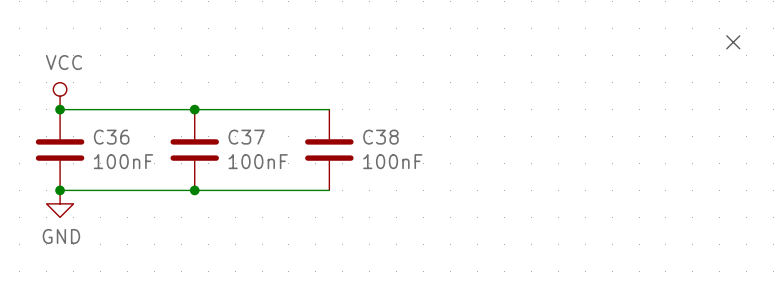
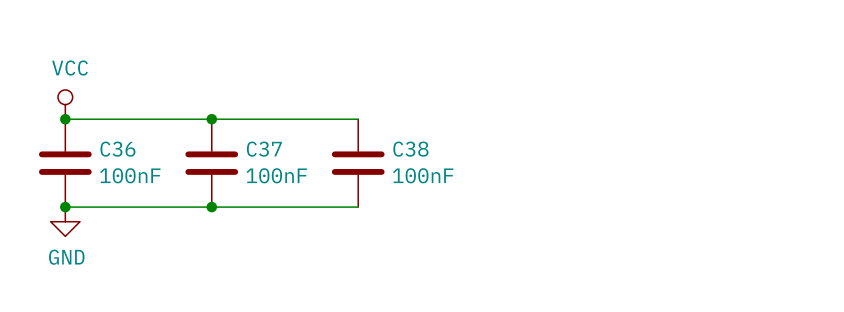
no-connect mark: (733, 42) -> none

